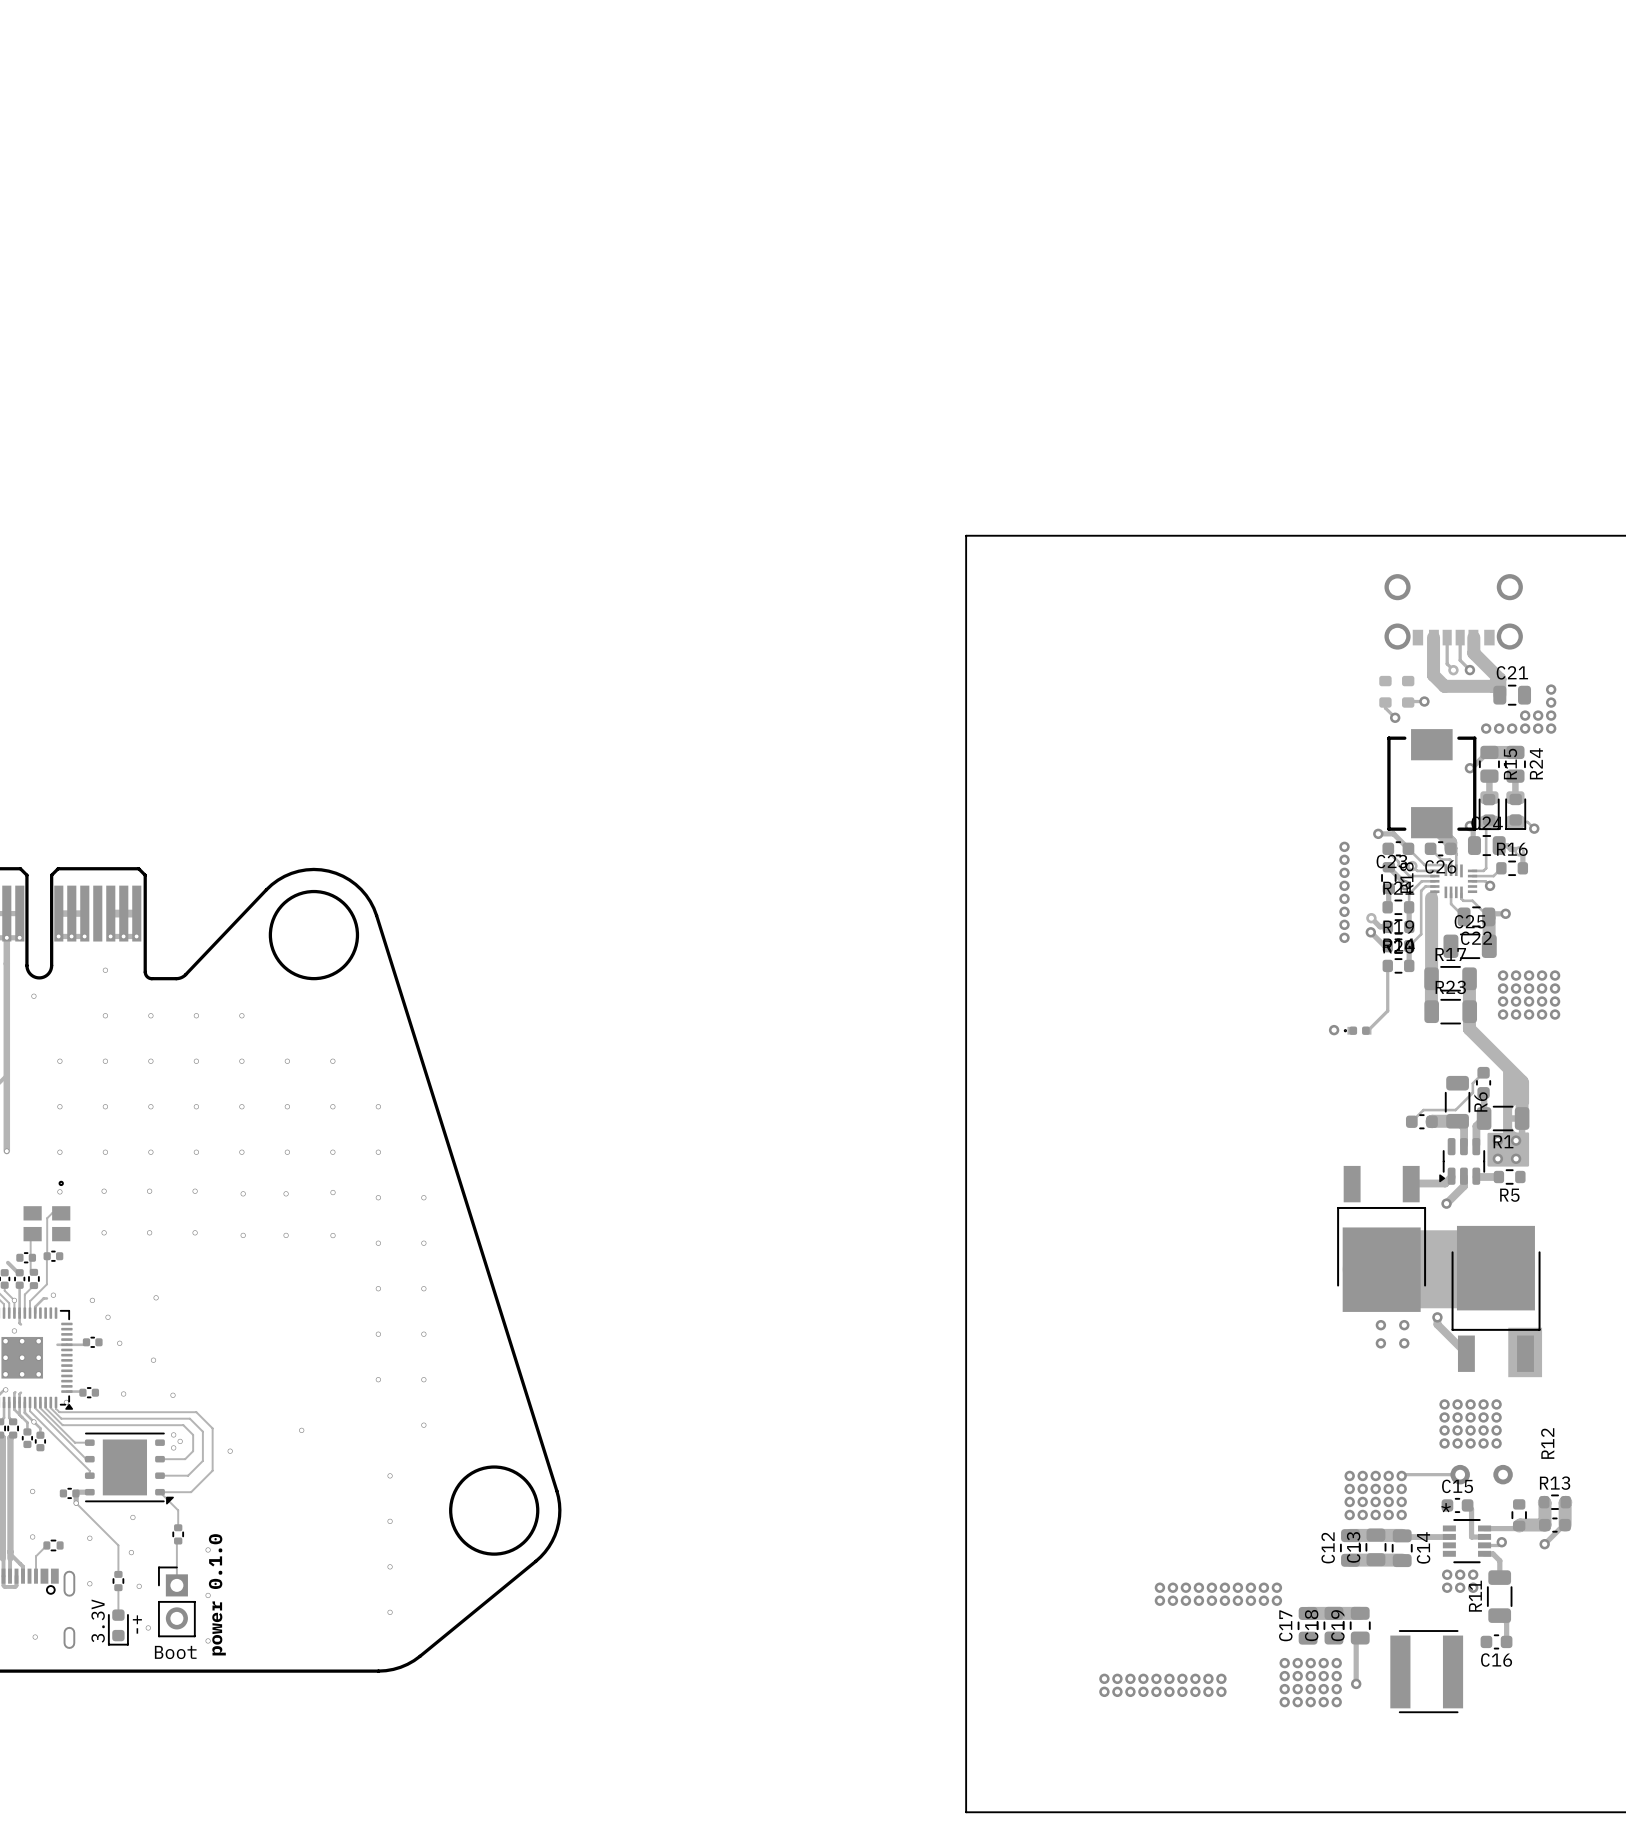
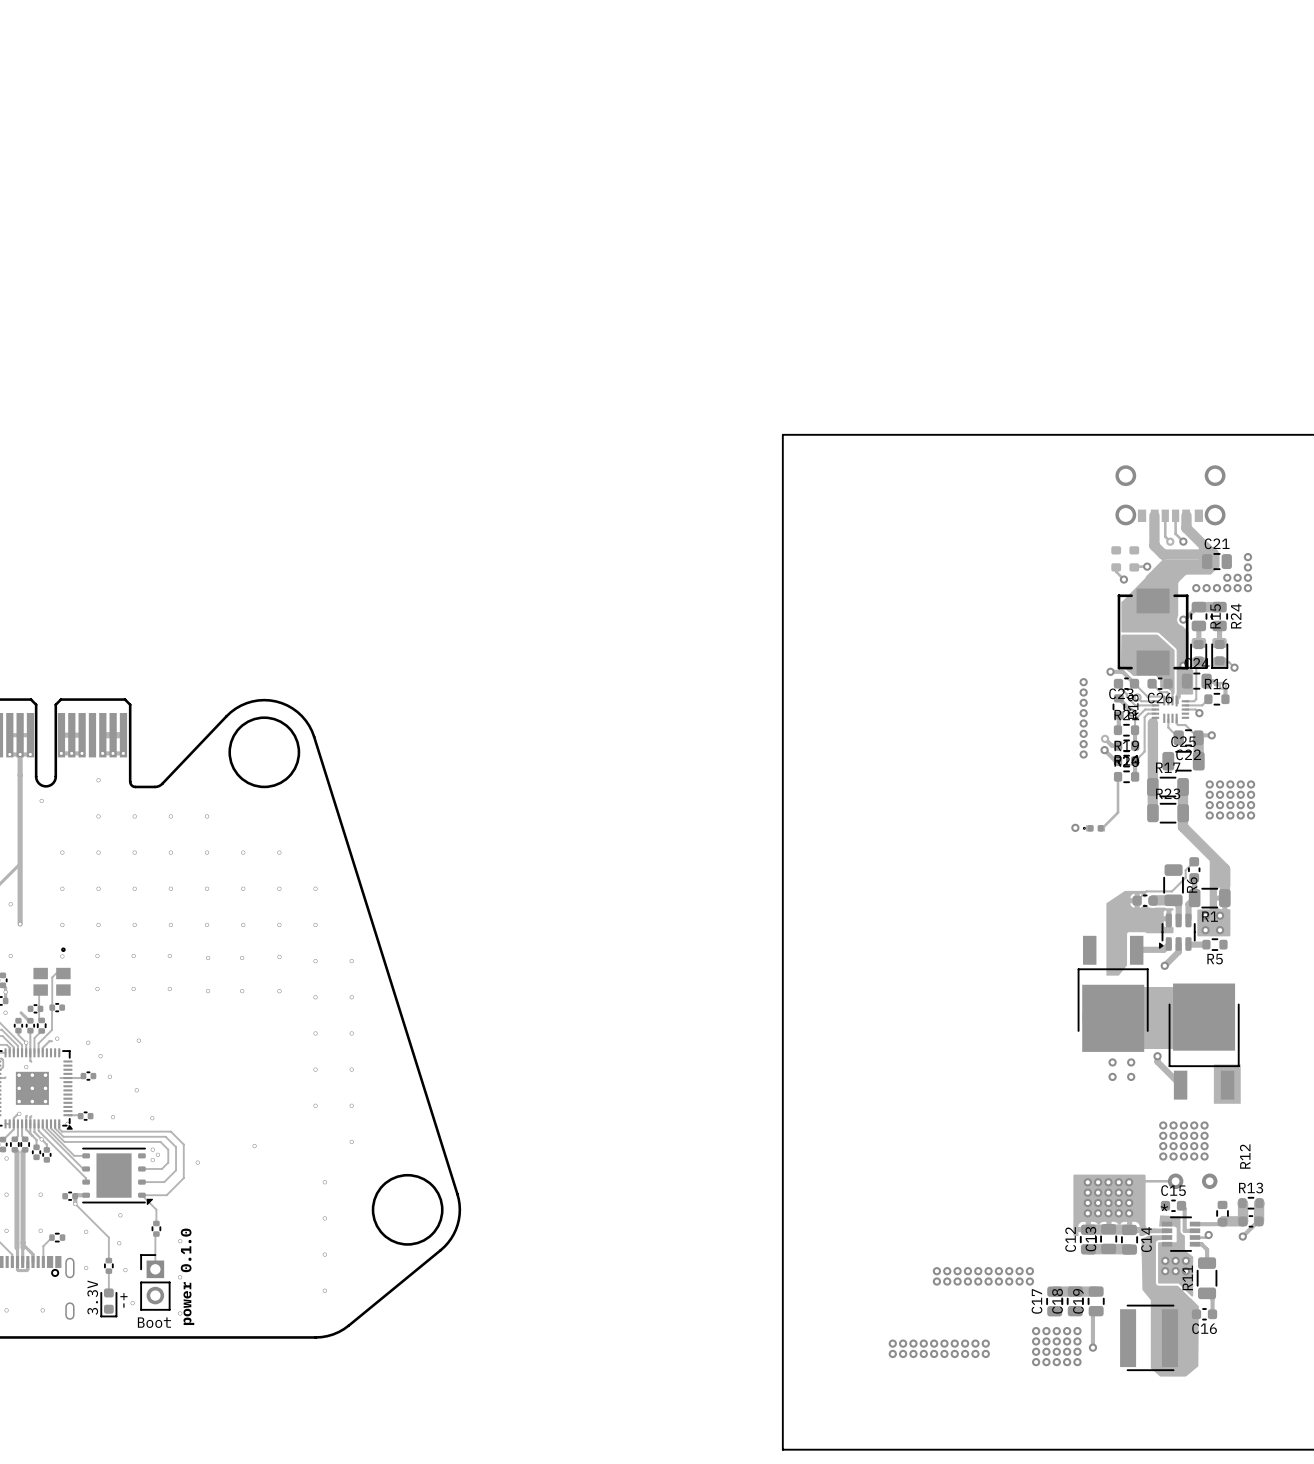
drawing: none -> [1120, 546, 1220, 705]
drawing: none -> [1106, 890, 1174, 976]
drawing: none -> [1073, 1174, 1199, 1377]

